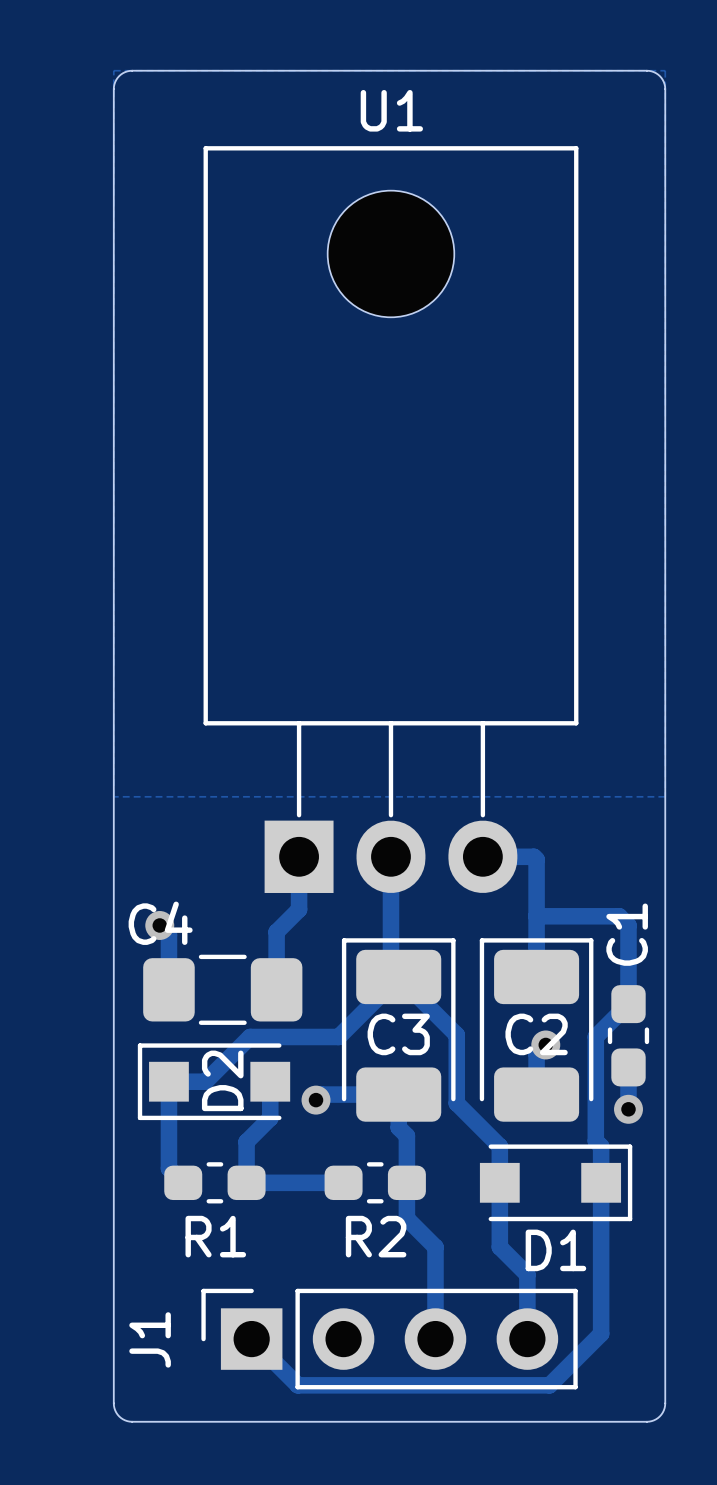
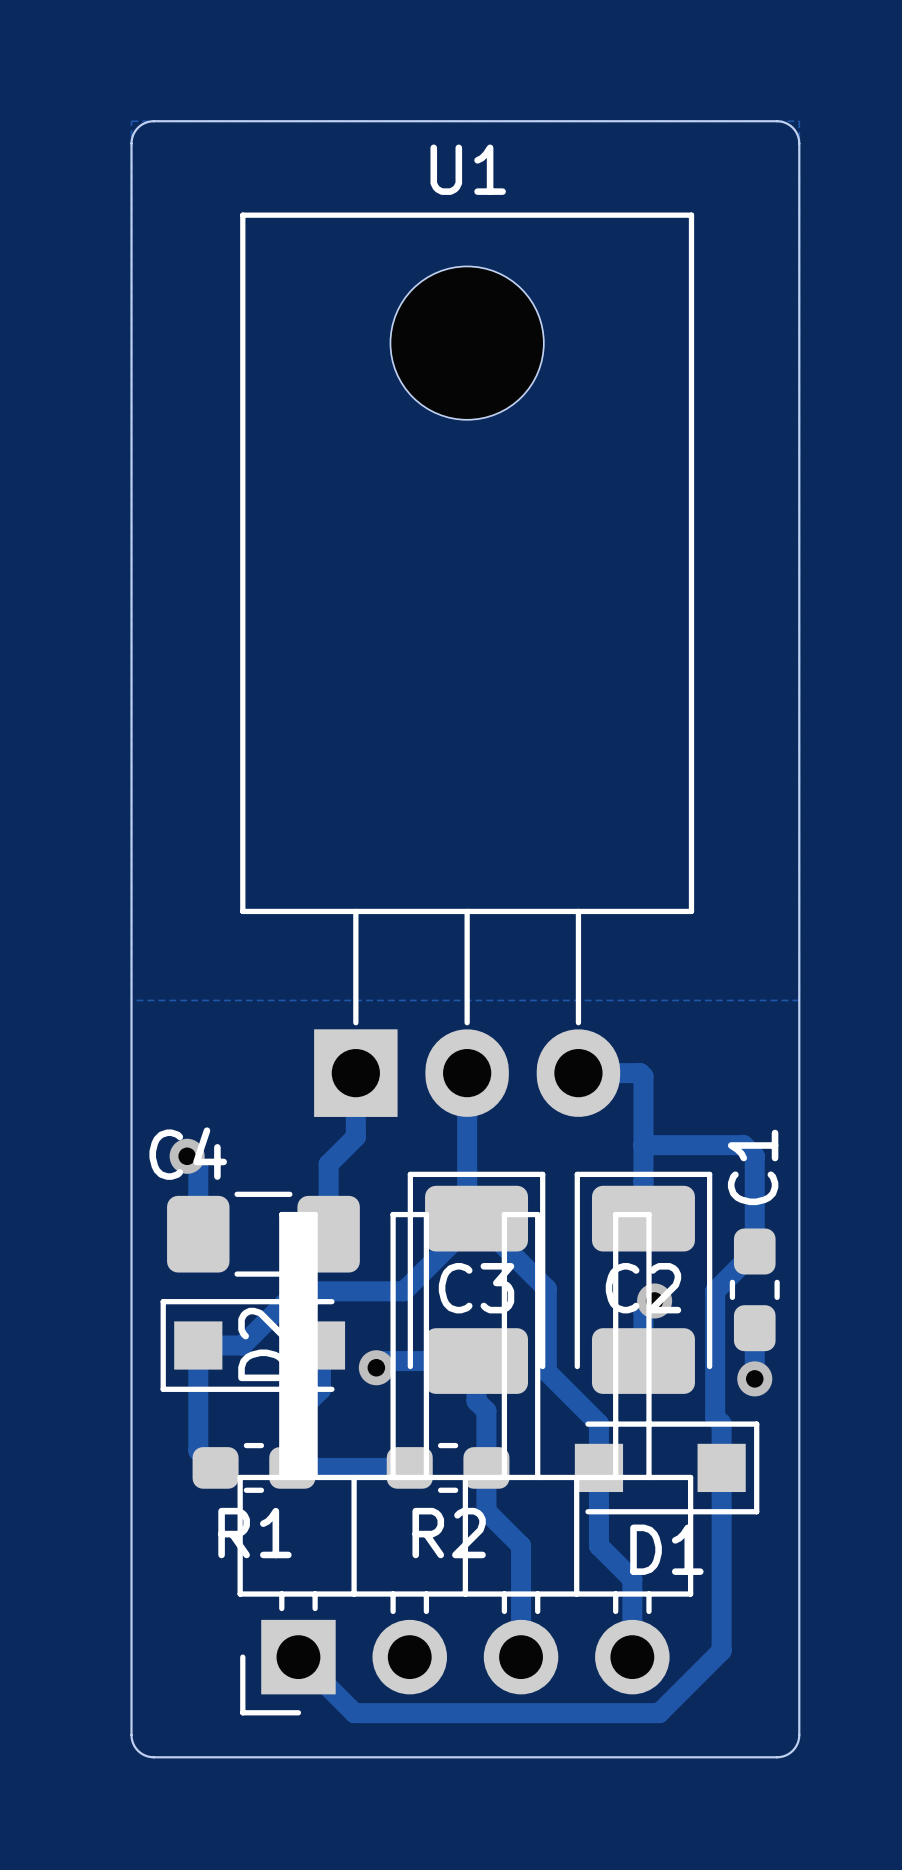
part: none -> (465, 1463)
J1: (389, 1339) -> none

